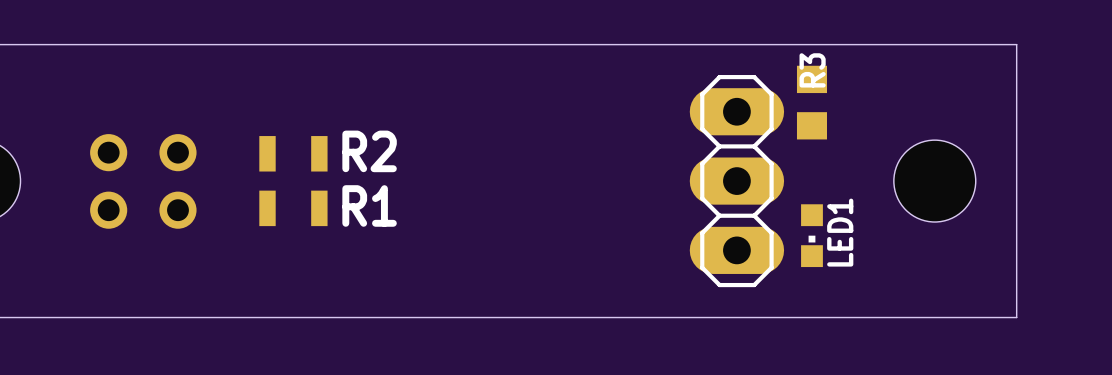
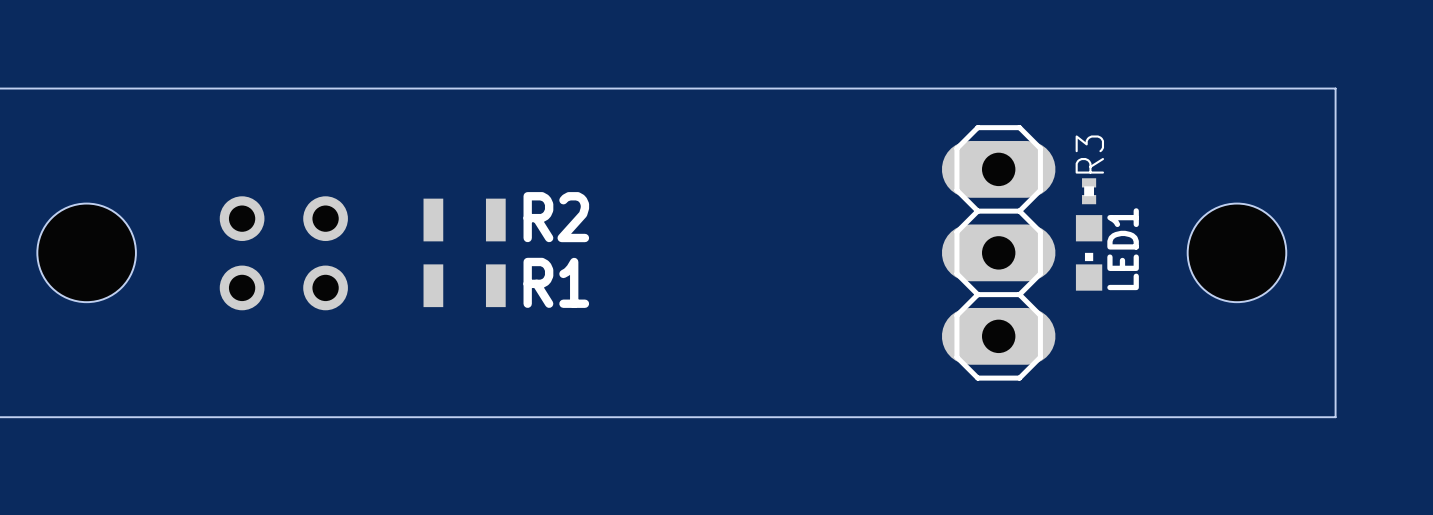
R3 footprint: [796, 65, 827, 140] -> [1082, 178, 1097, 205]
LED1 position: (811, 235) -> (1089, 252)

